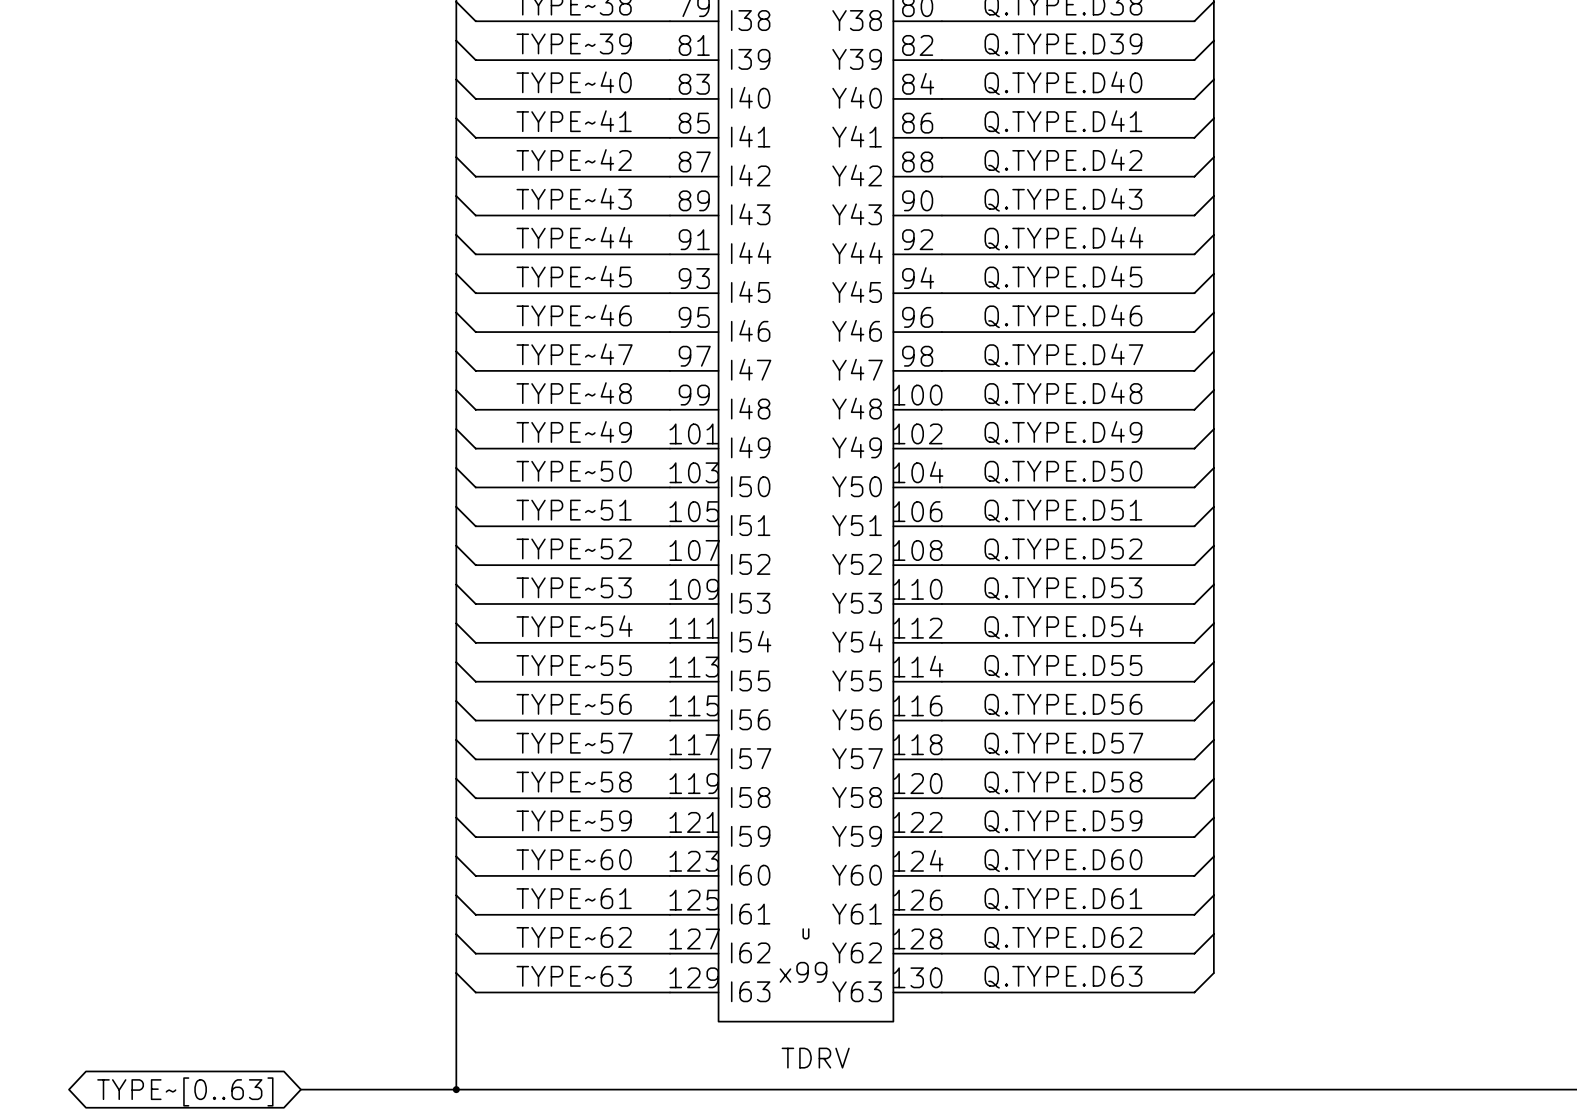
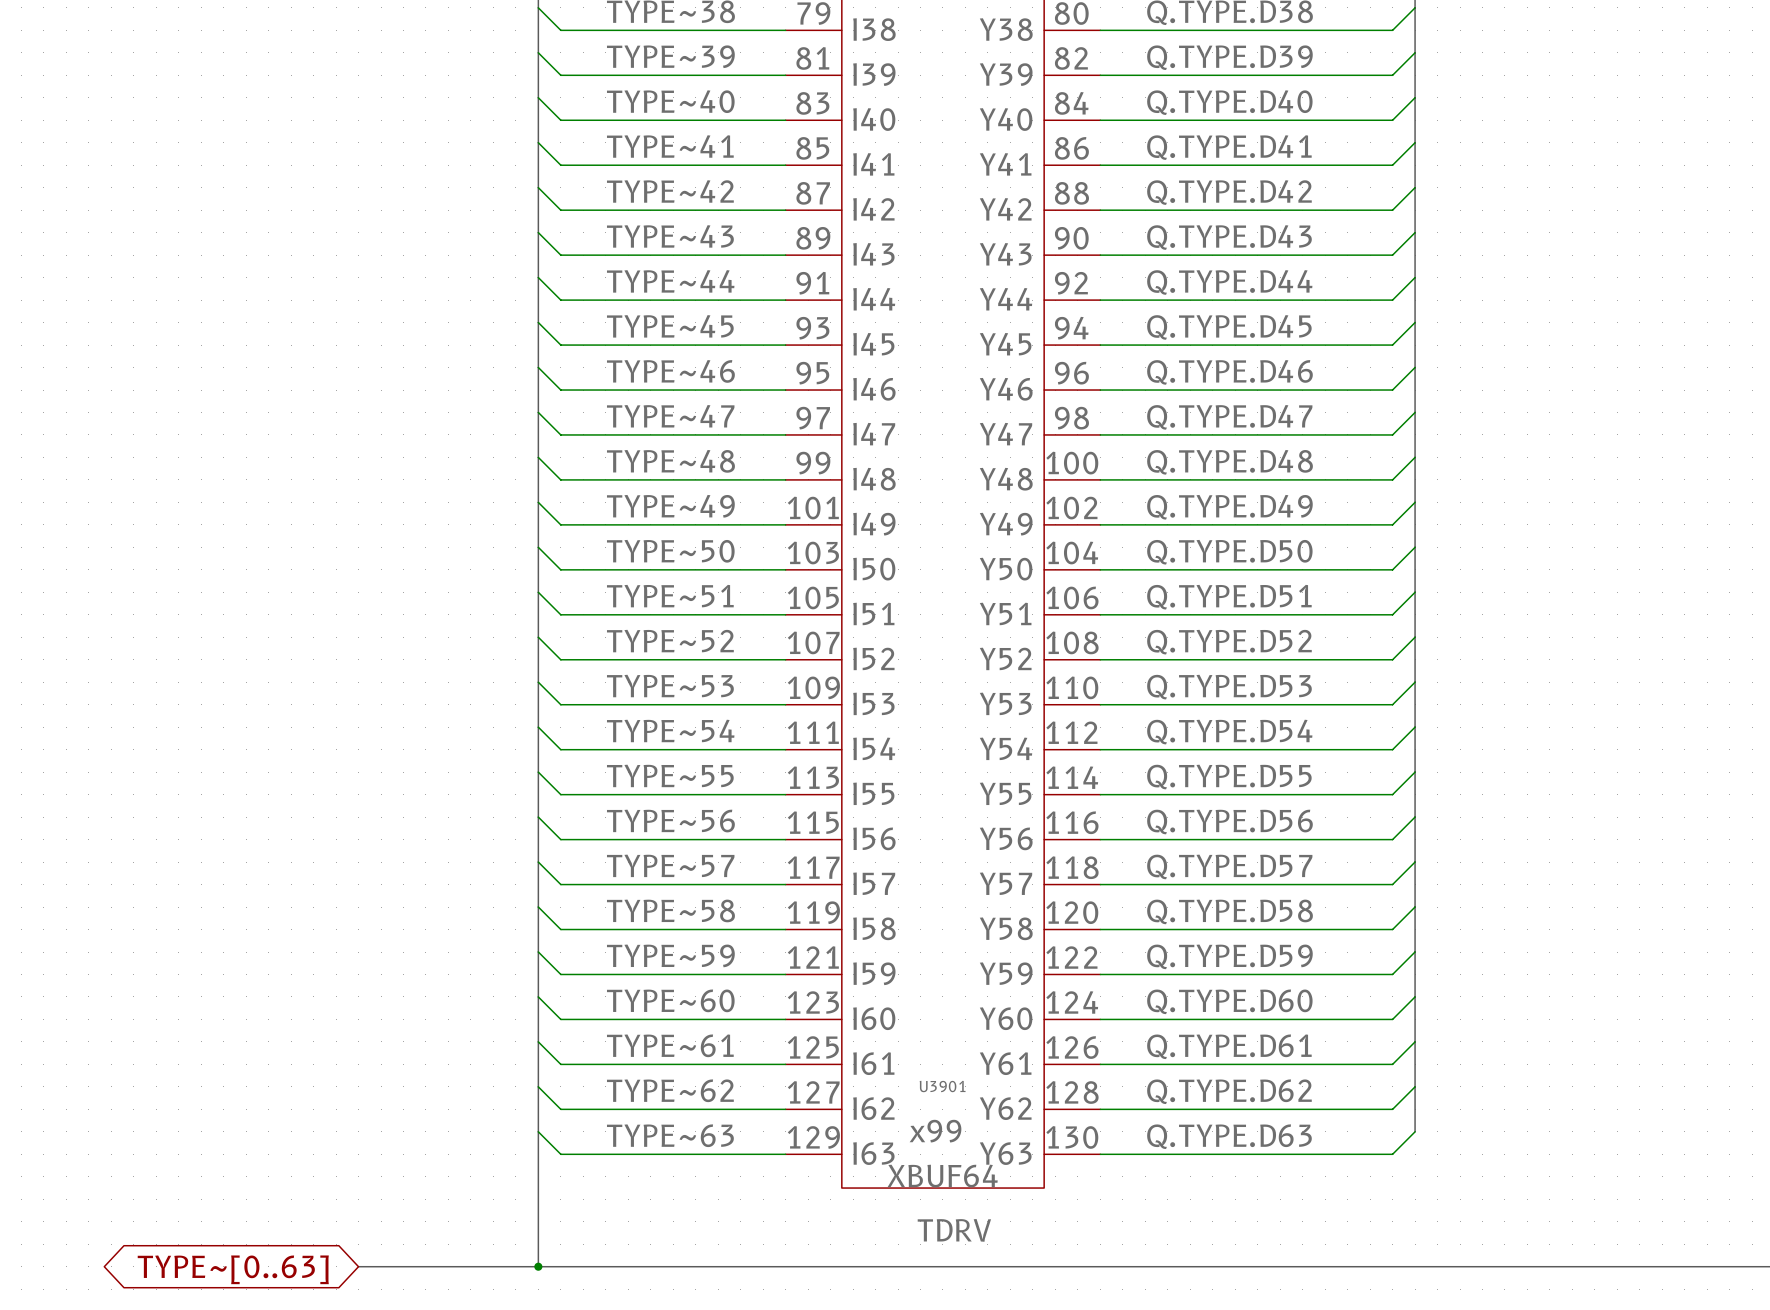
U name: U (805, 933) -> U3901 (942, 1086)
U value: none -> XBUF64 (942, 1176)

